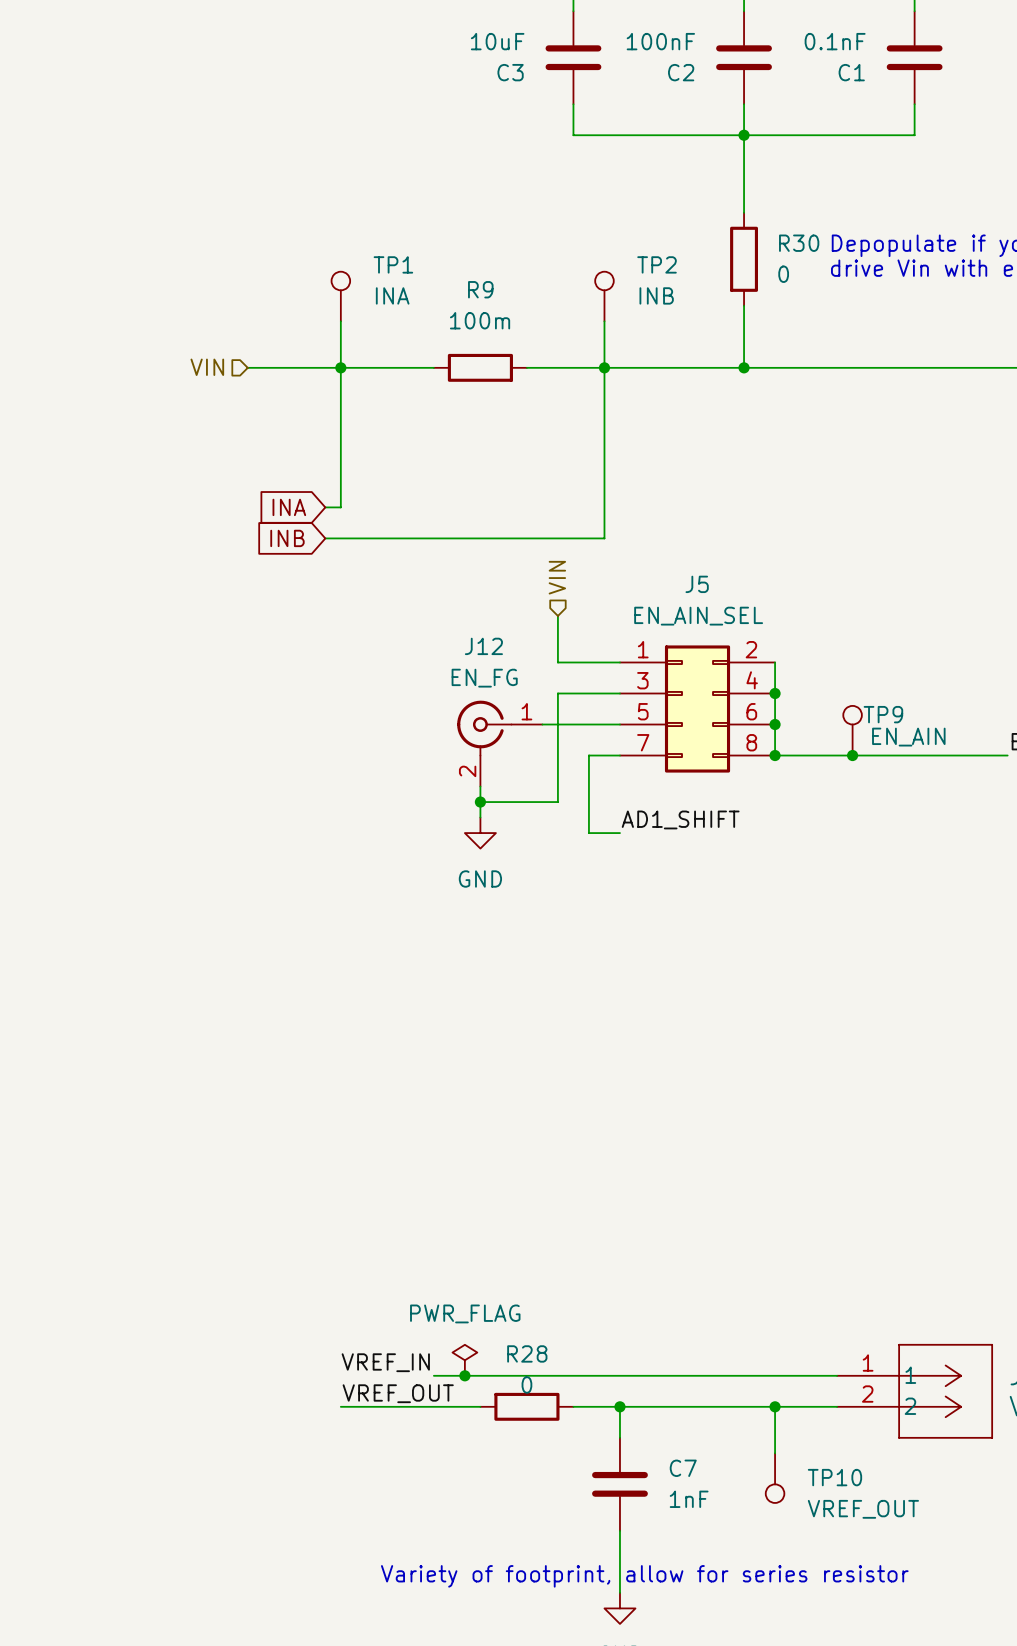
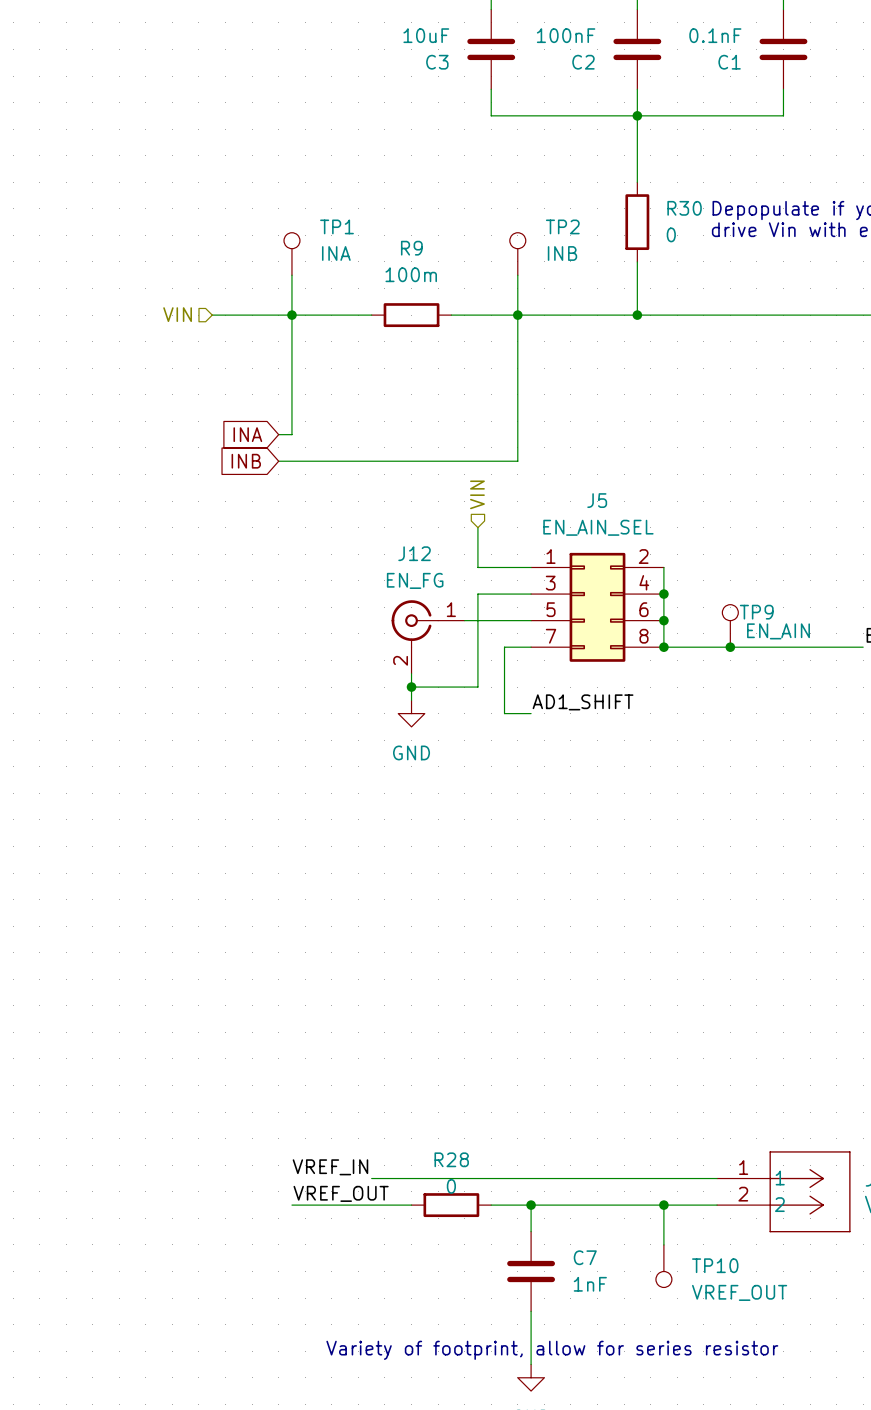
power symbol: PWR_FLAG (464, 1360) -> none
junction: (464, 1375) -> none

